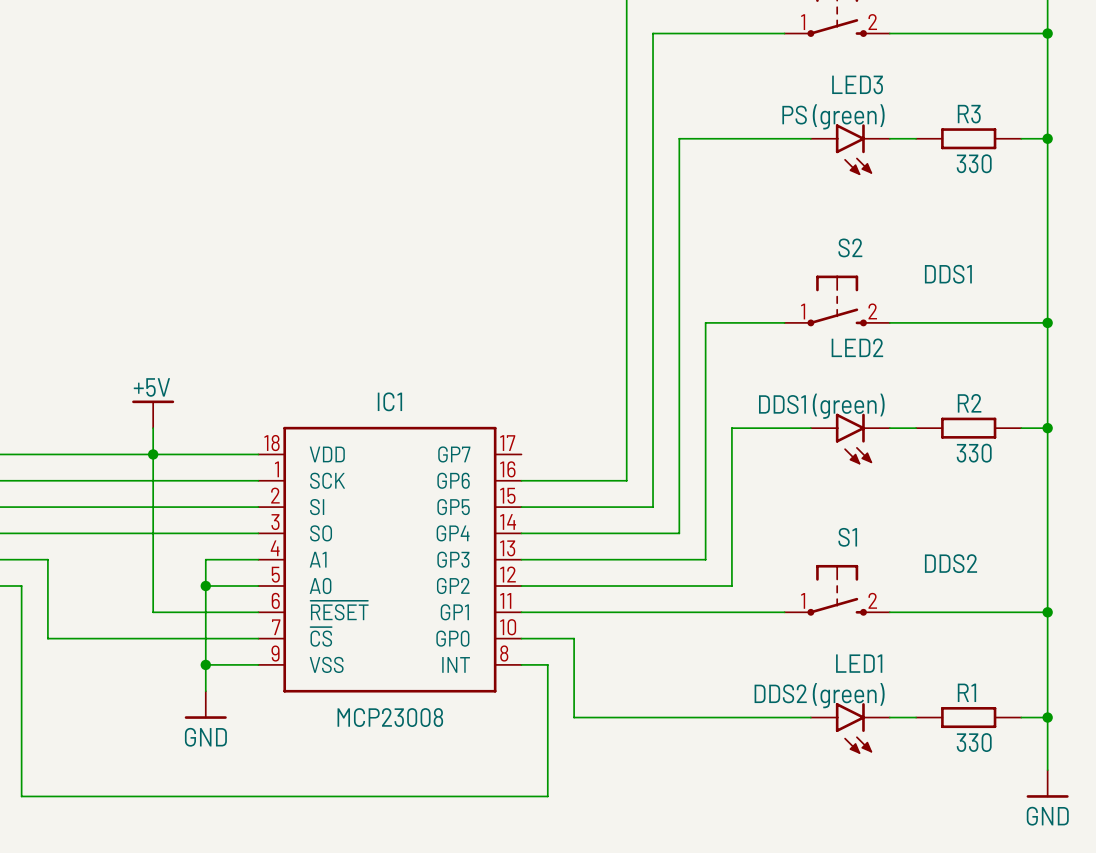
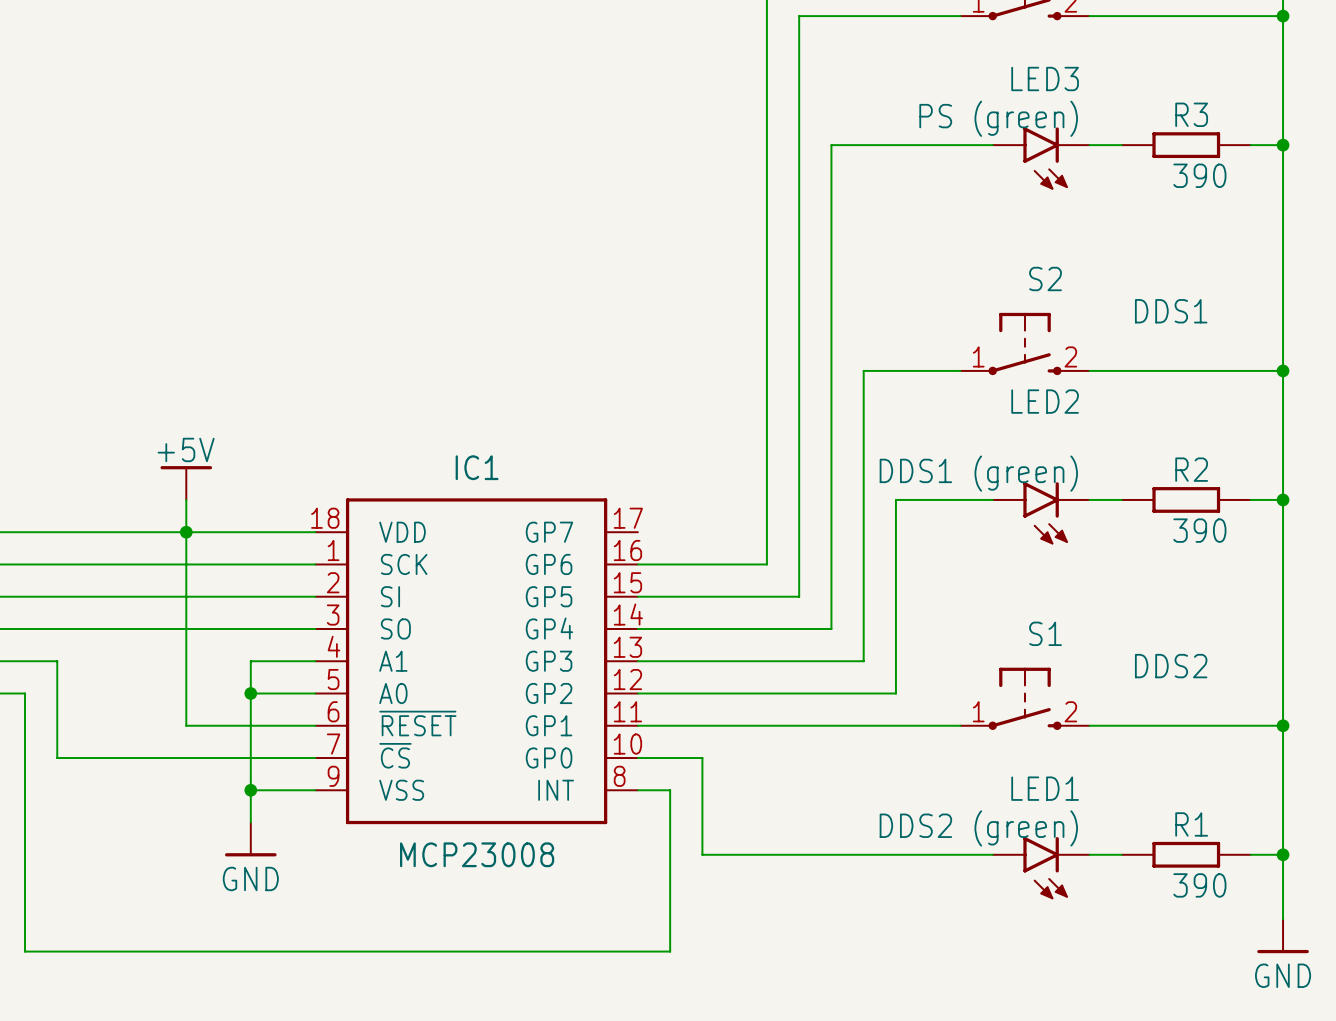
R3 value: 330 (974, 163) -> 390 (1199, 175)
R2 value: 330 (974, 453) -> 390 (1199, 530)
R1 value: 330 (974, 742) -> 390 (1199, 885)

